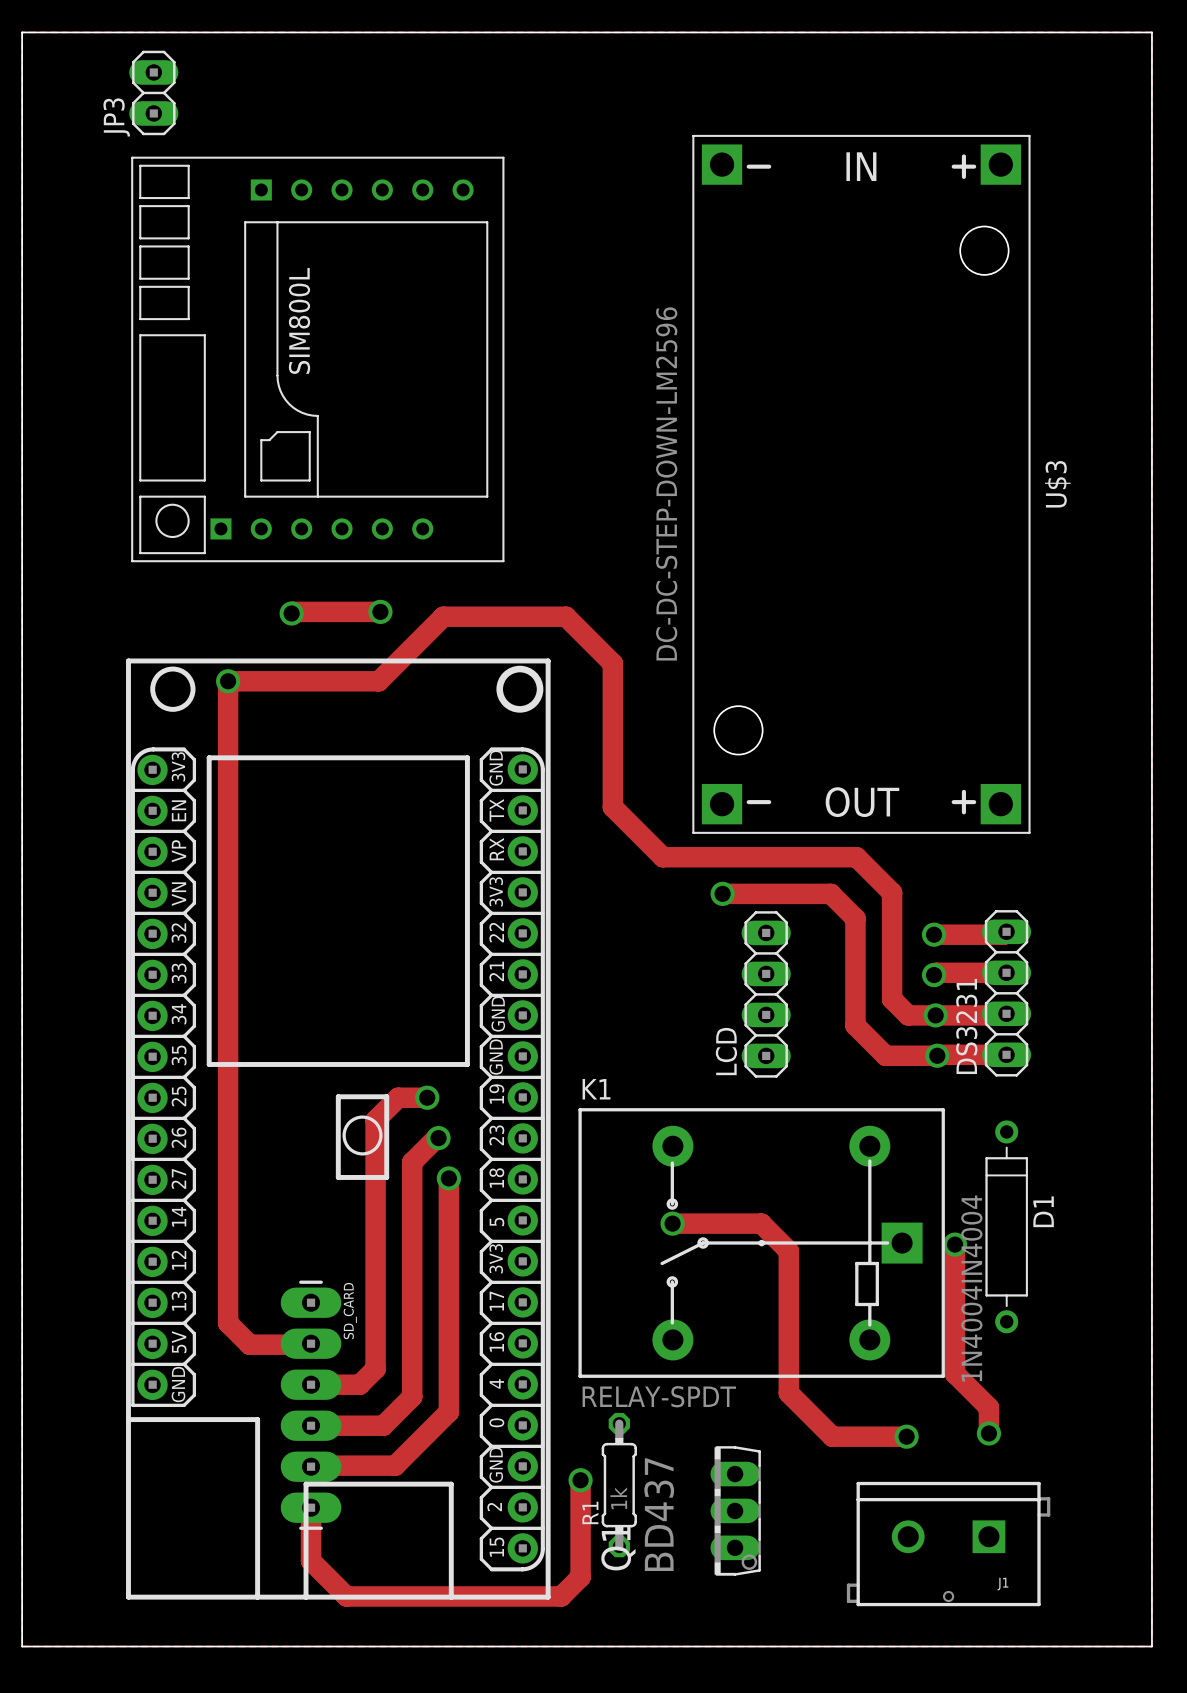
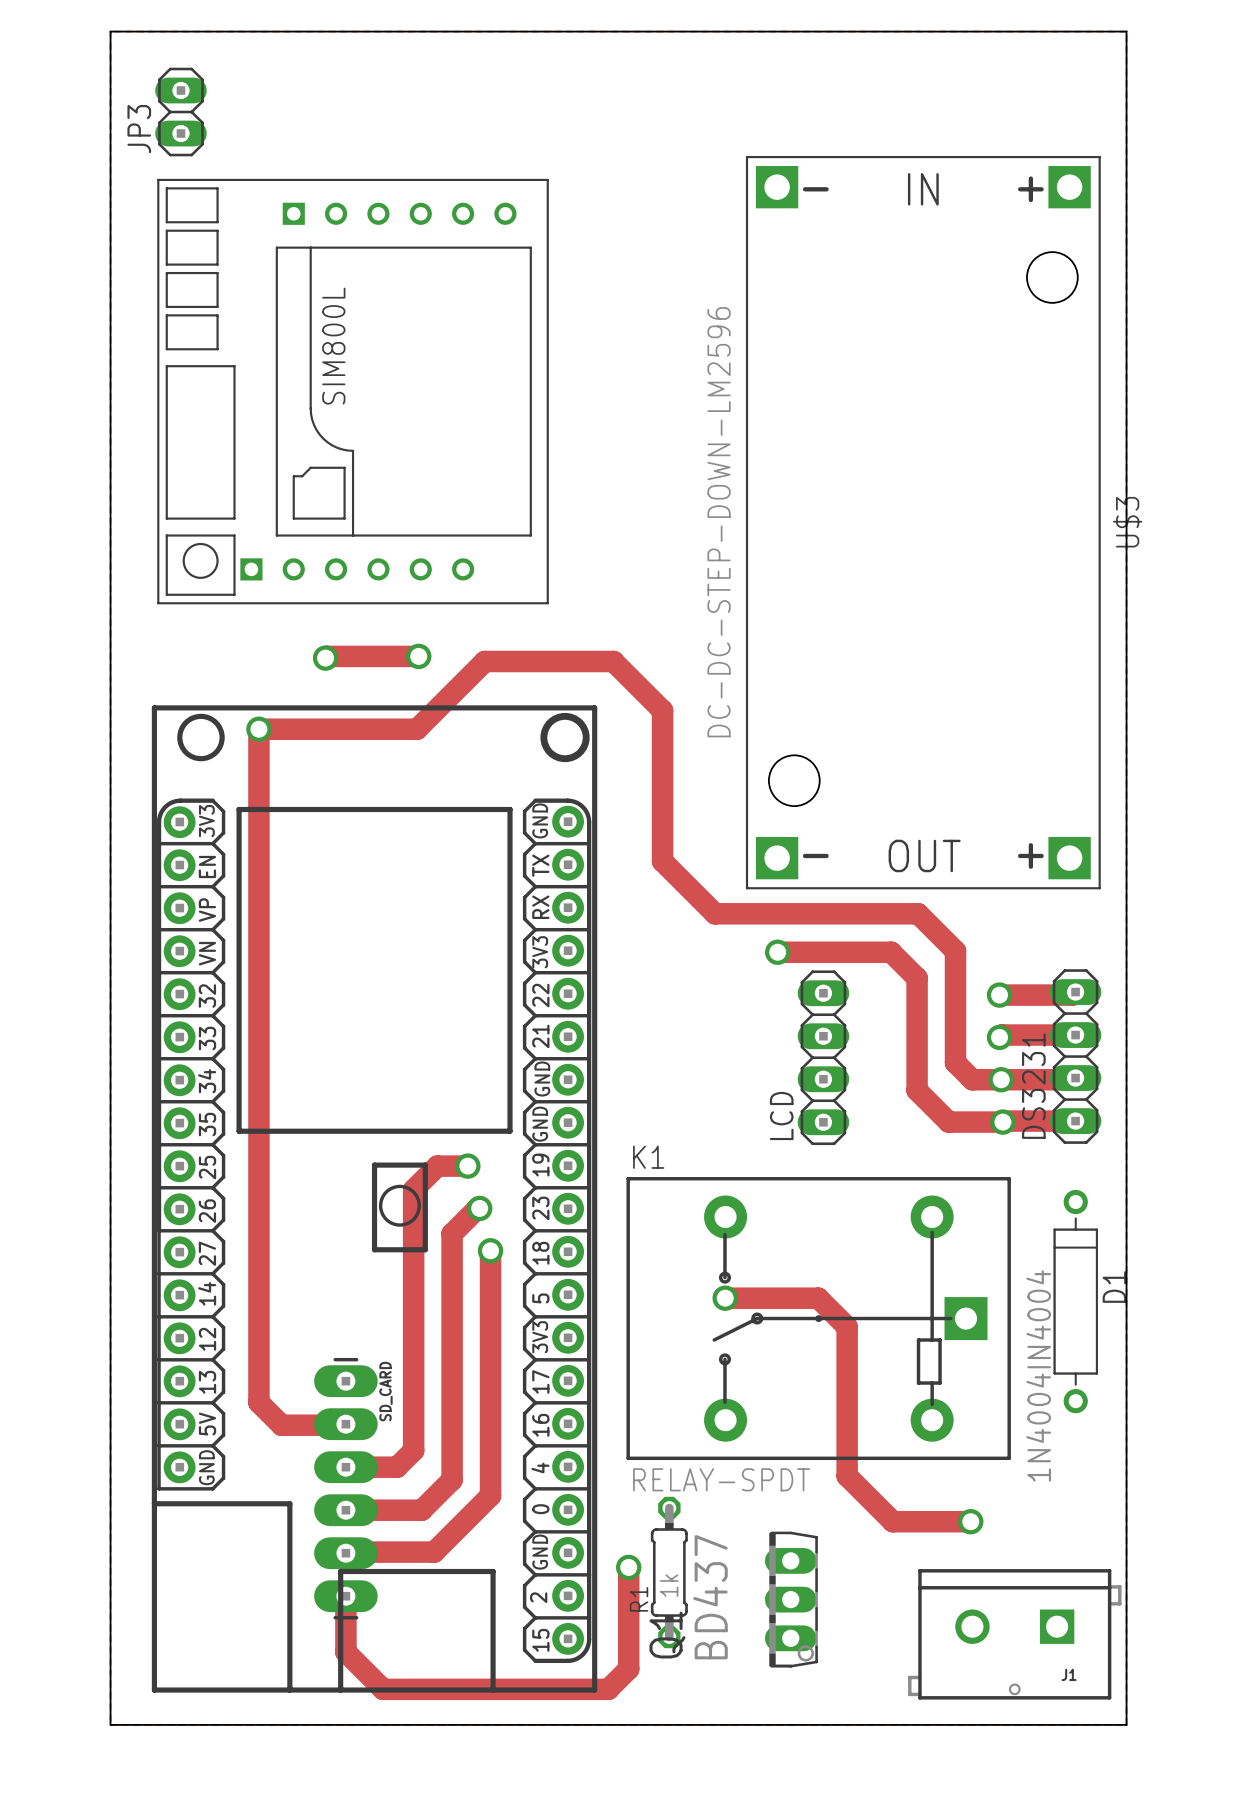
board edge: (22, 32) (1151, 32) (1151, 1646) (22, 1646) (22, 32) -> (110, 31) (110, 1724) (1126, 1724) (1126, 31) (110, 31)
track: (955, 1244) (955, 1373) (988, 1407) (988, 1433) -> none
via: (955, 1244) -> none
via: (988, 1433) -> none

